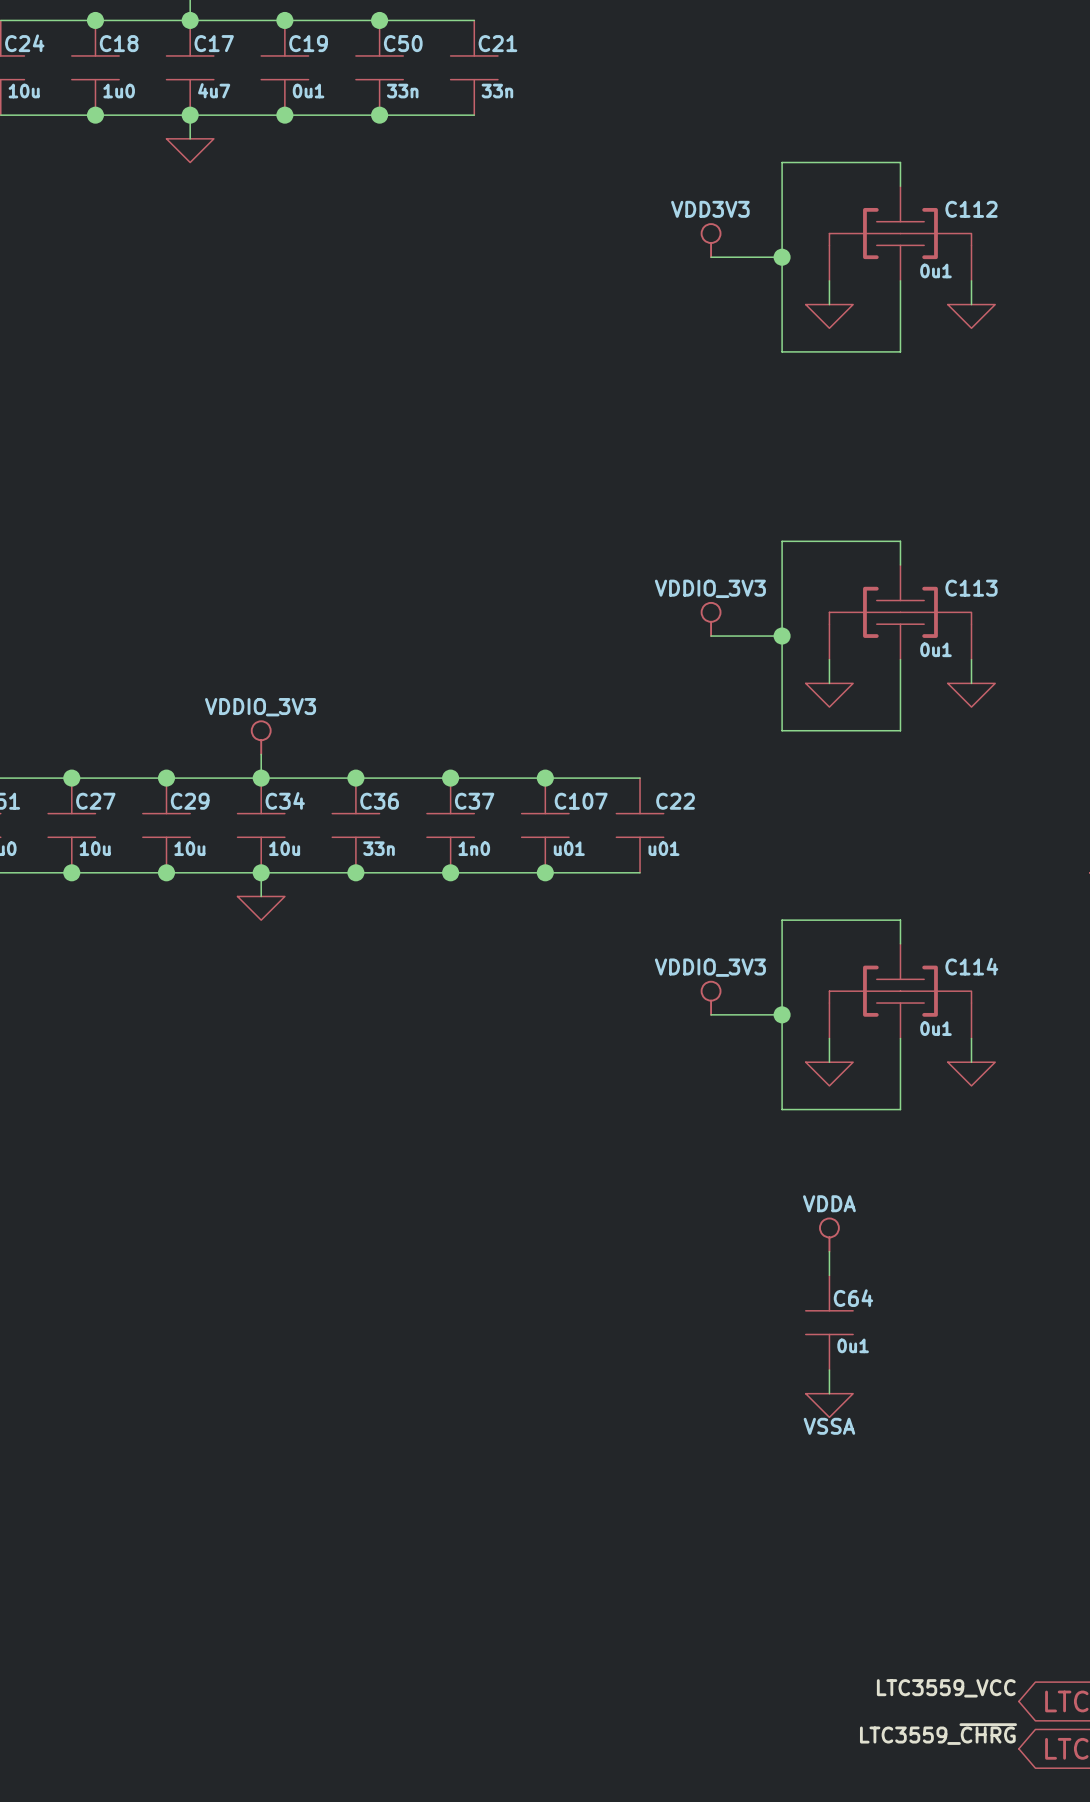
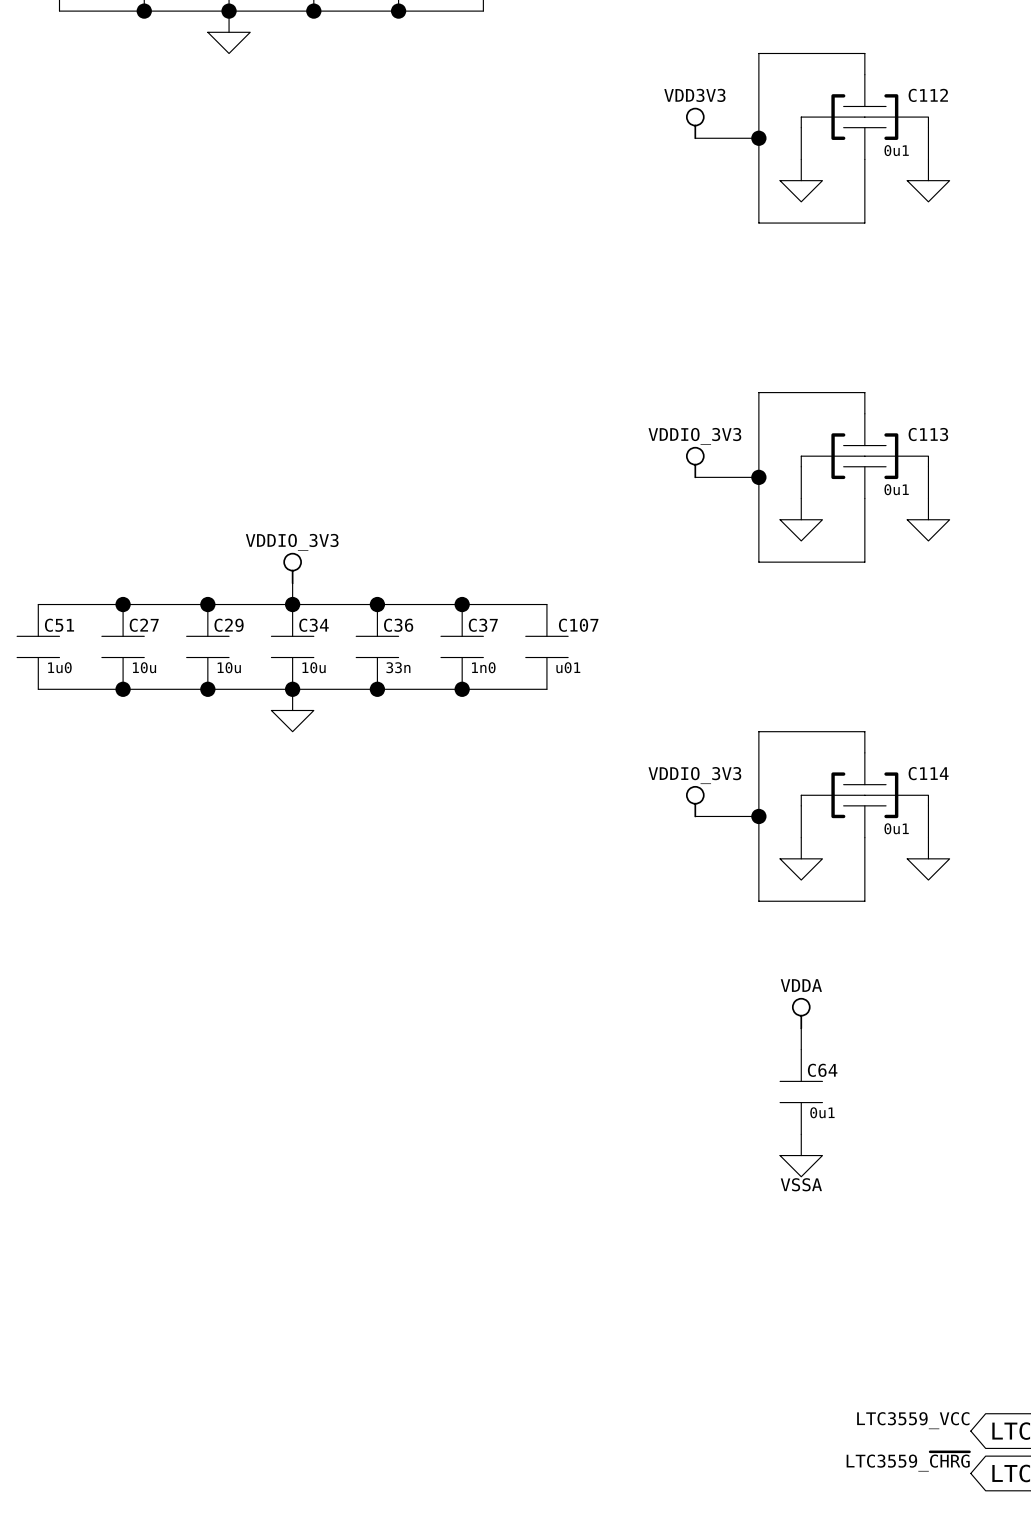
wire: (545, 778) (640, 778) -> none
junction: (545, 778) -> none
C22: u01 (640, 825) -> none
wire: (545, 872) (640, 872) -> none
junction: (545, 872) -> none

